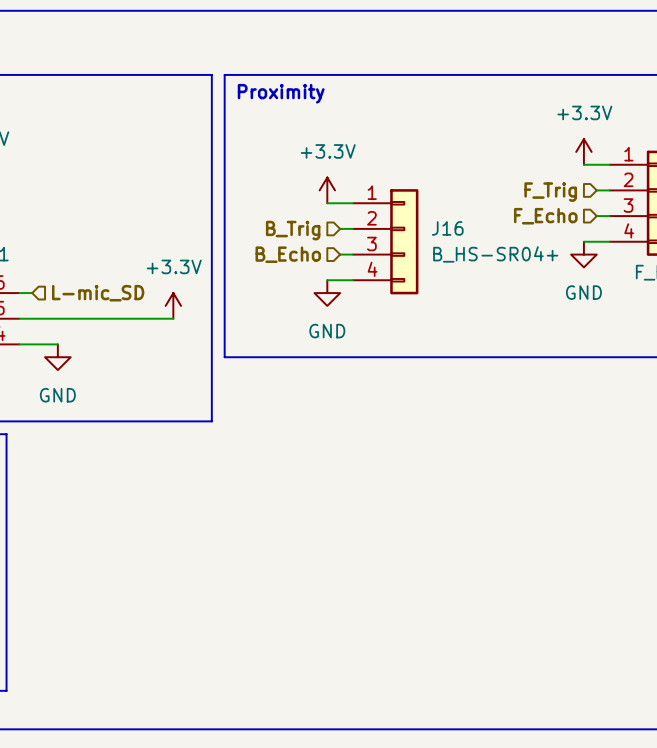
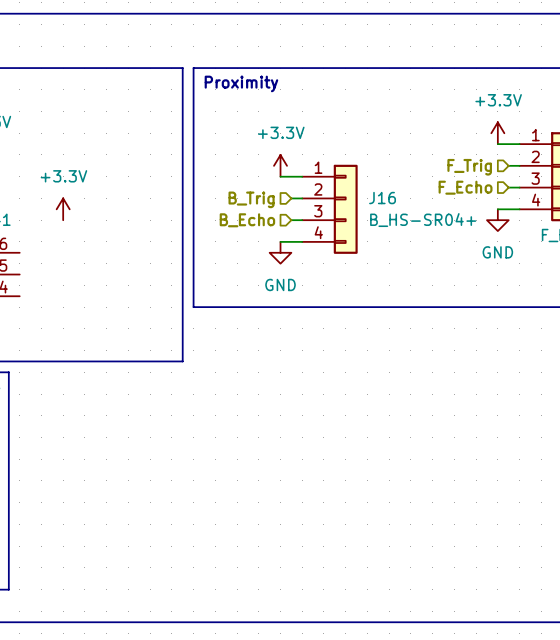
wire: (19, 293) (32, 293) -> none
hierarchical label: L-mic_SD (98, 293) -> none
power symbol position: +3.3V (173, 305) -> +3.3V (63, 209)
wire: (19, 318) (173, 318) -> none
wire: (19, 344) (57, 344) -> none
power symbol: GND (57, 357) -> none

